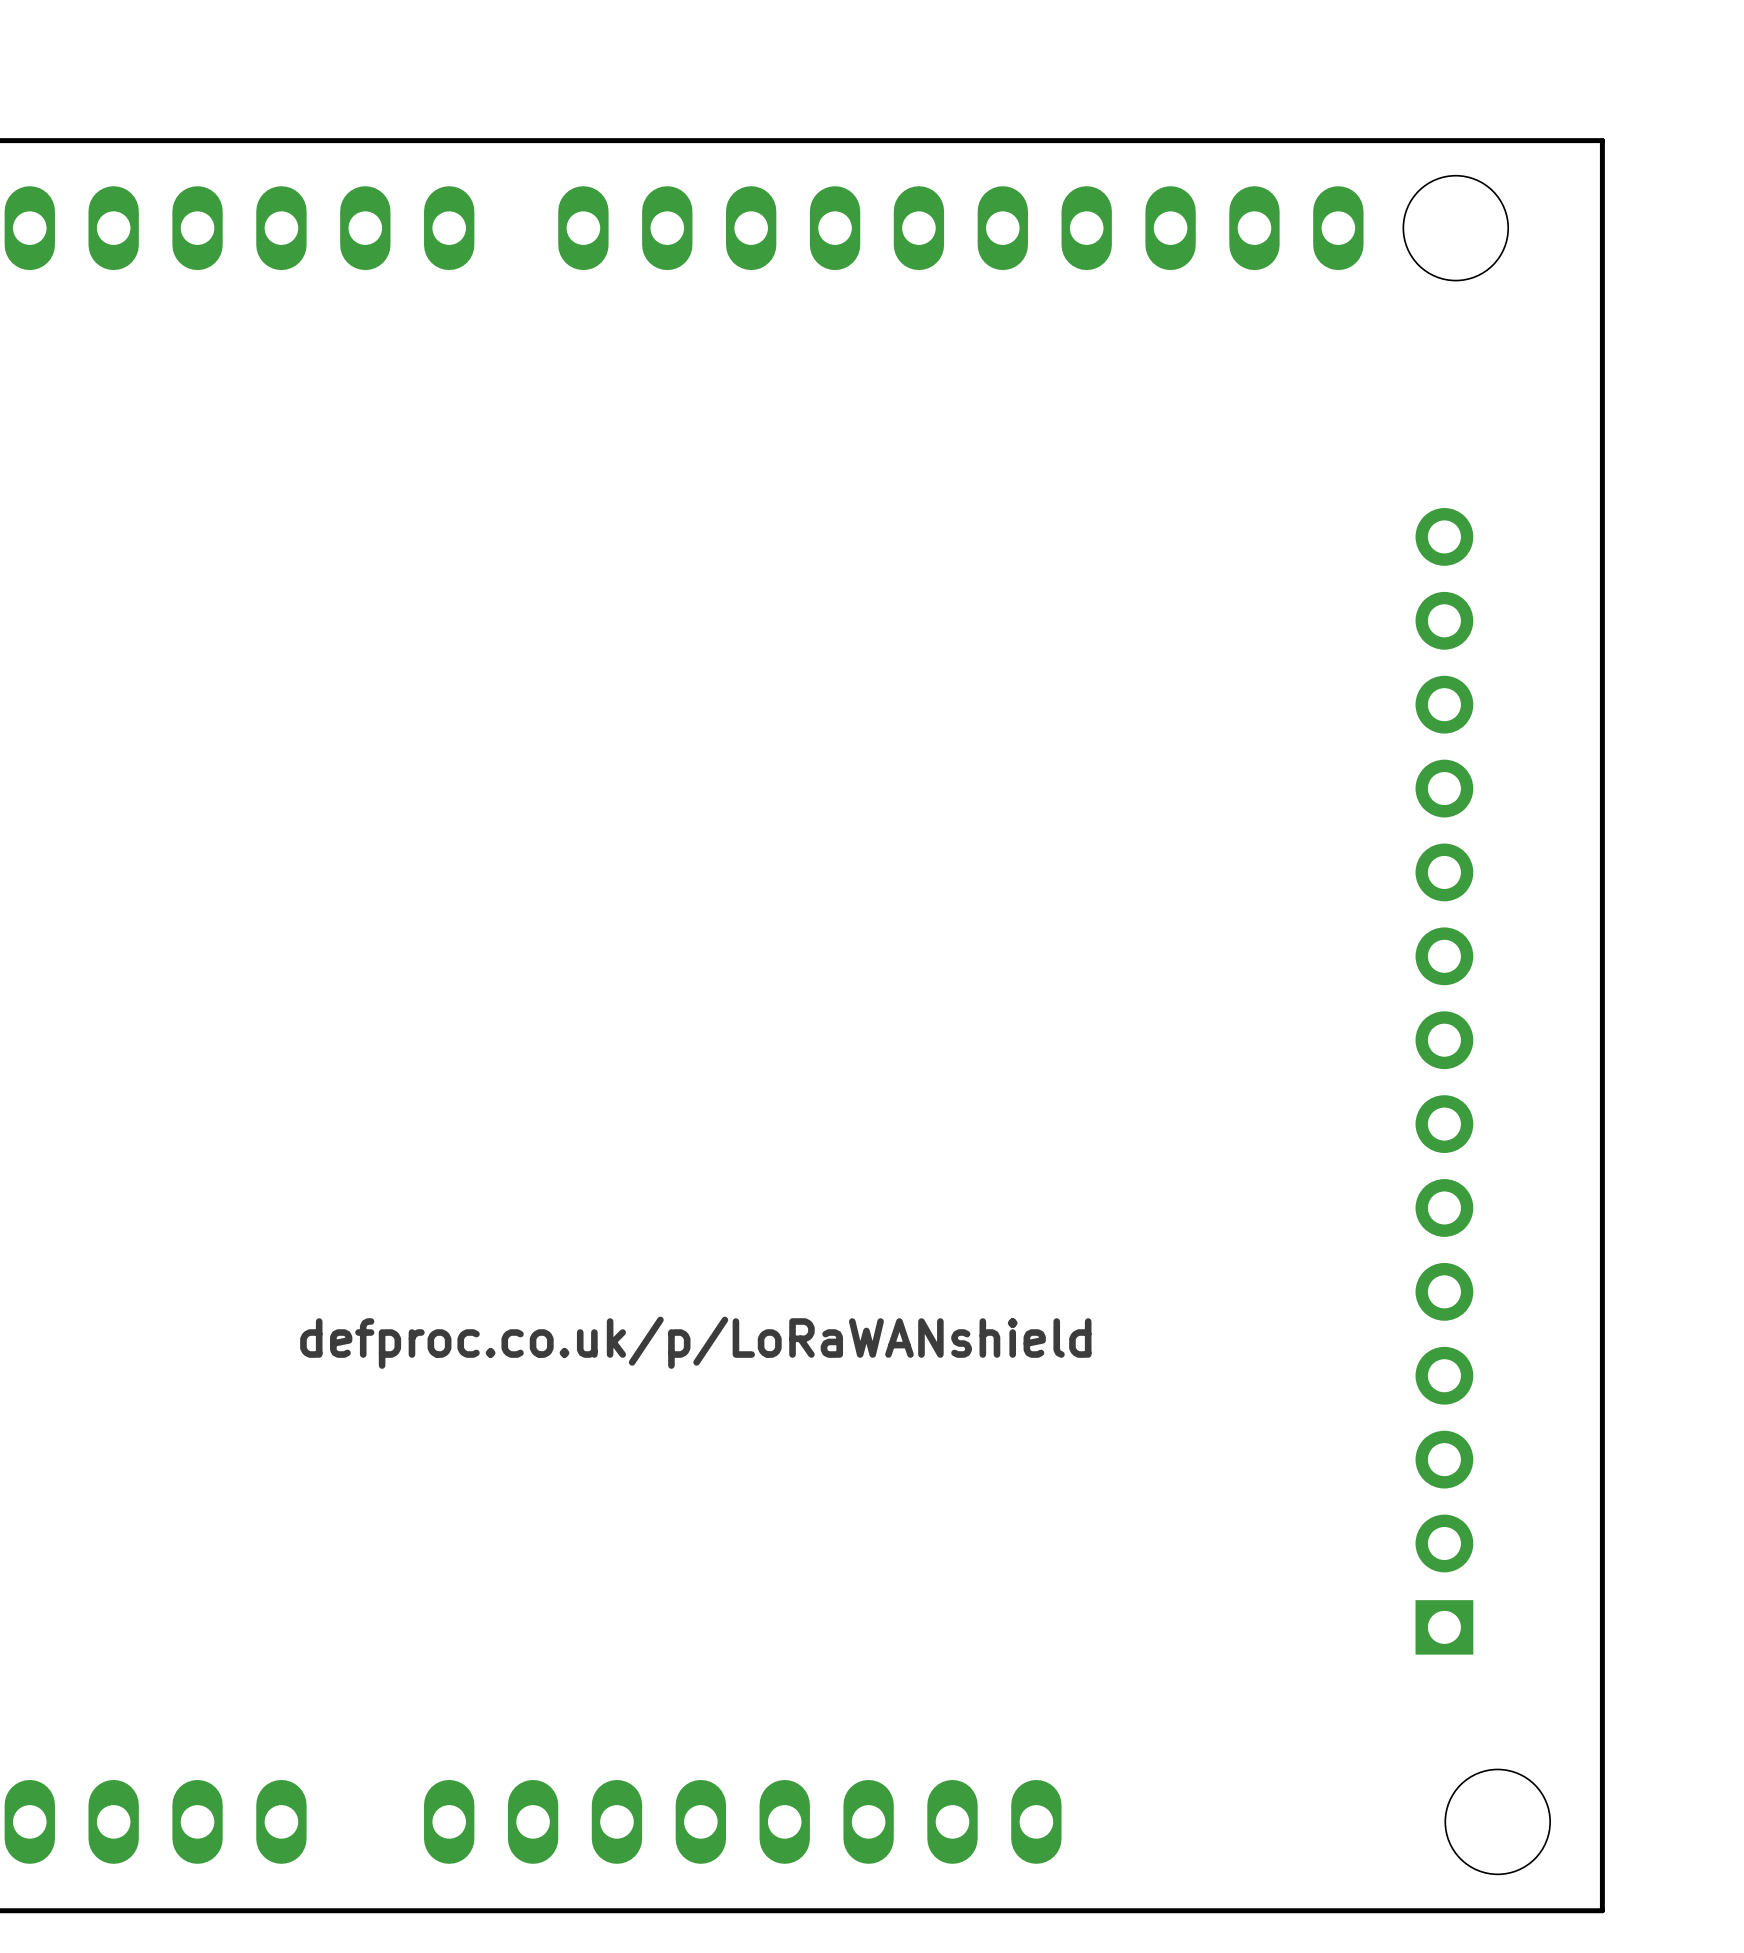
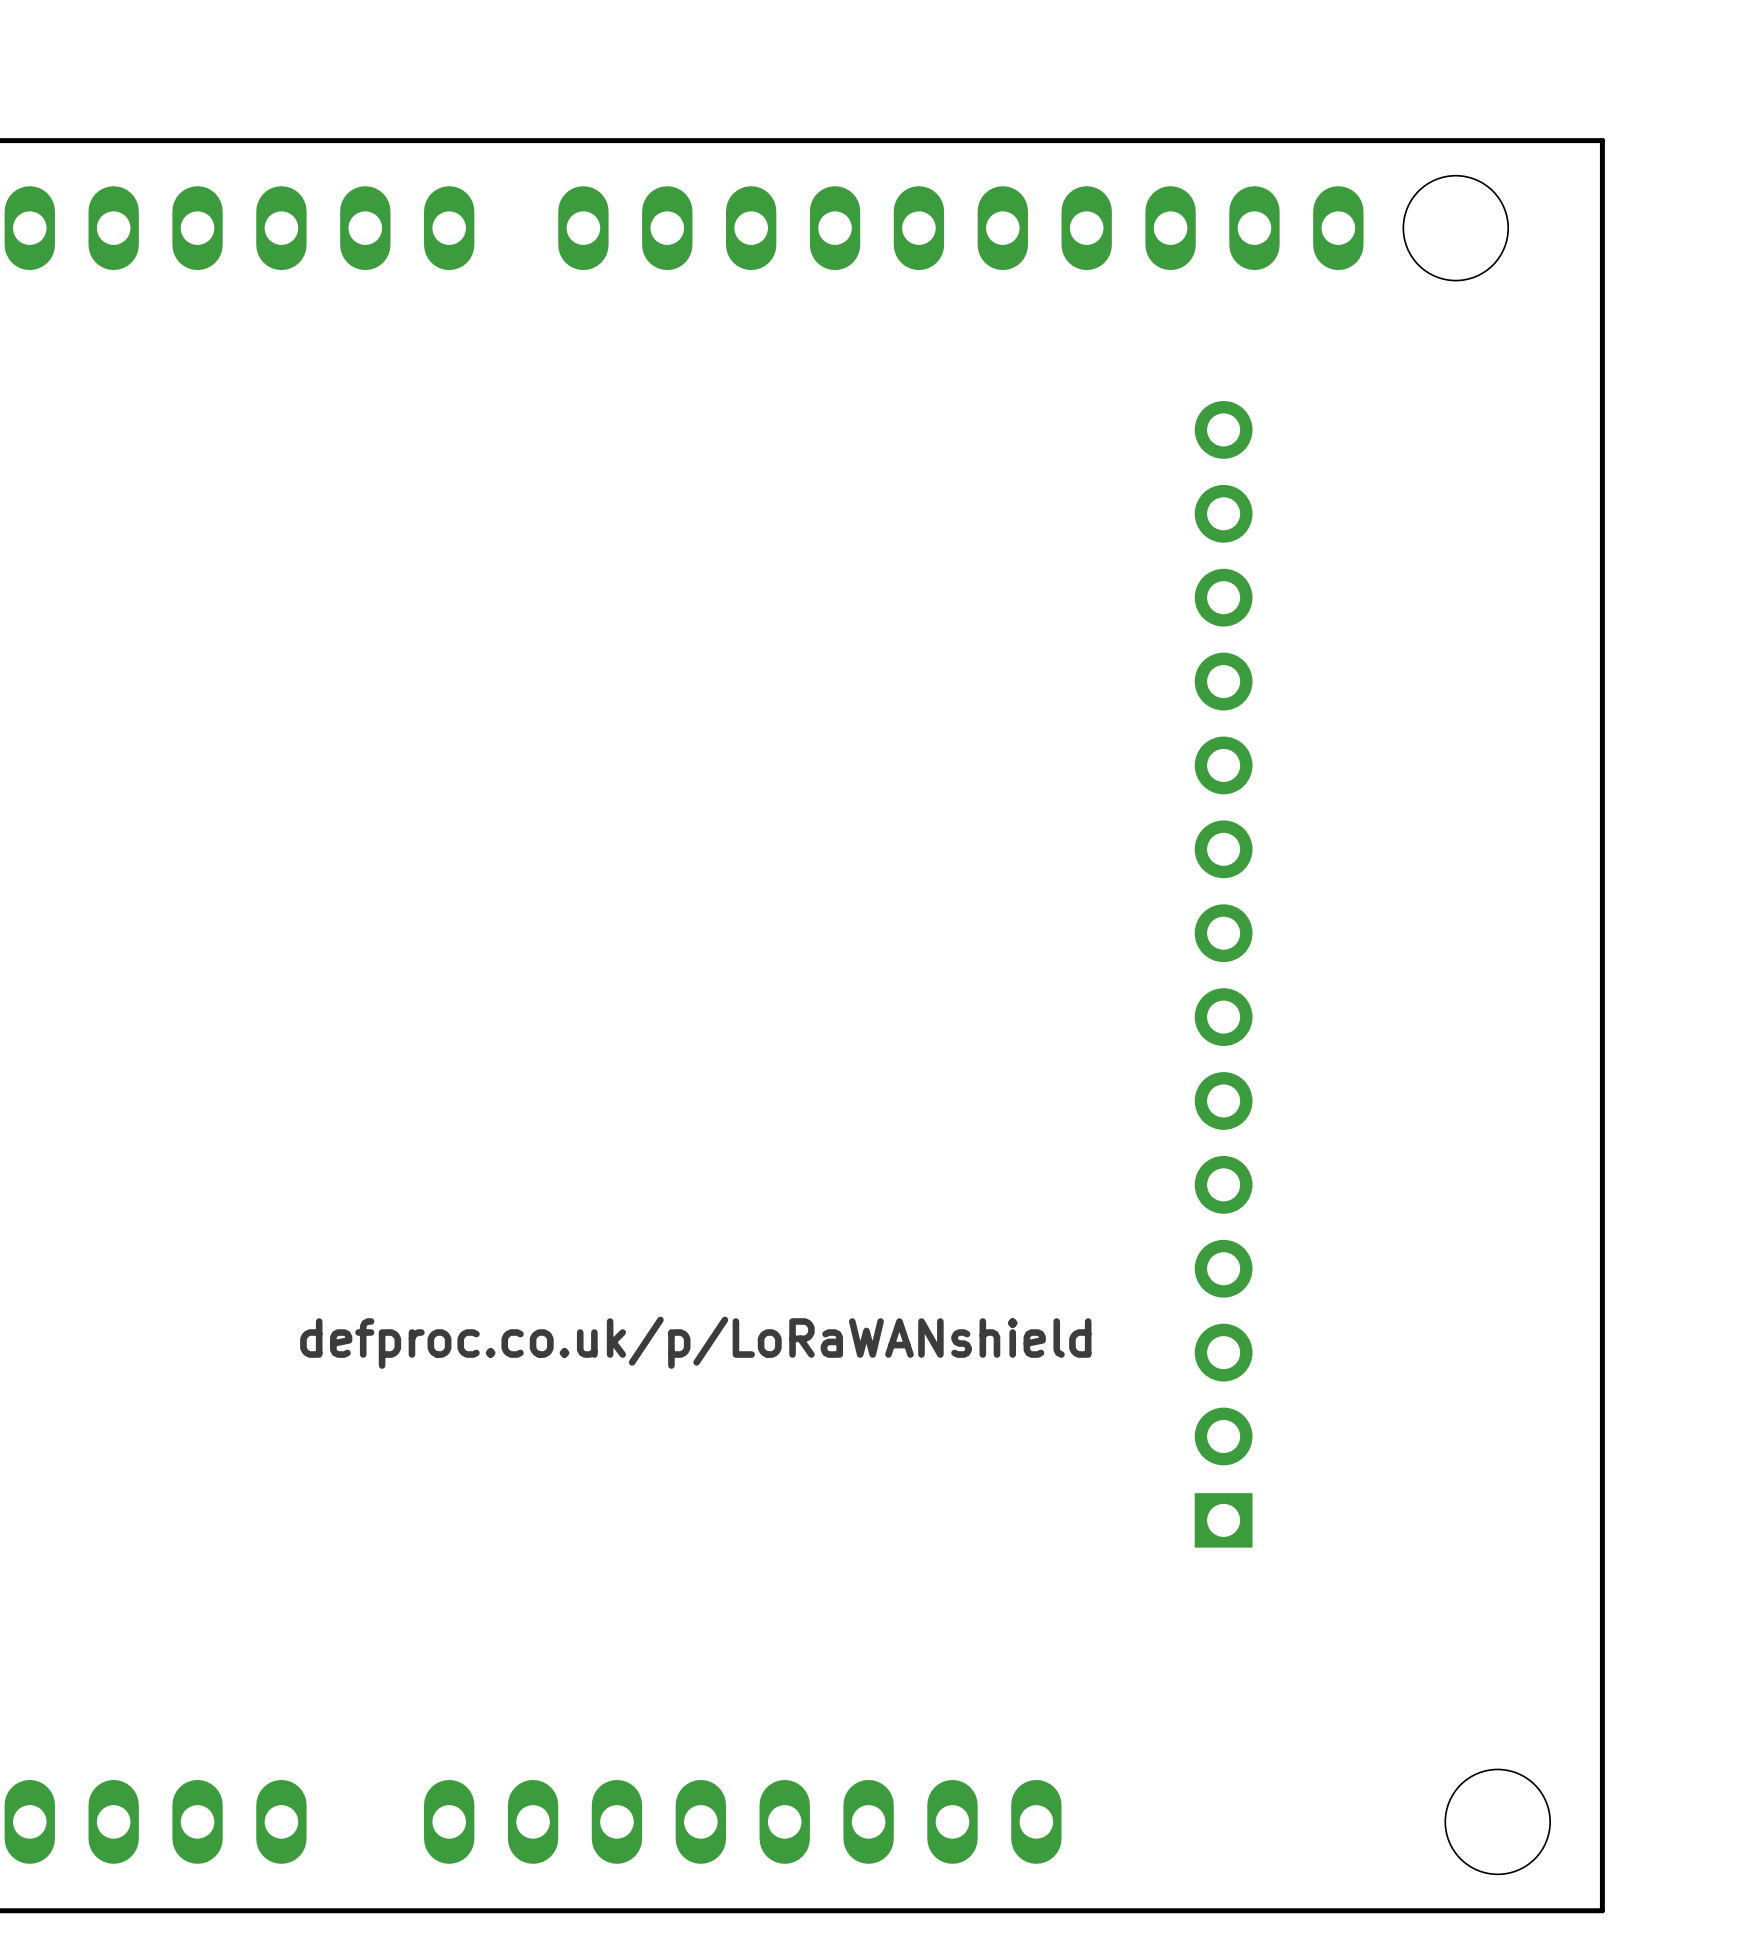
part position: (1444, 1081) -> (1223, 974)

